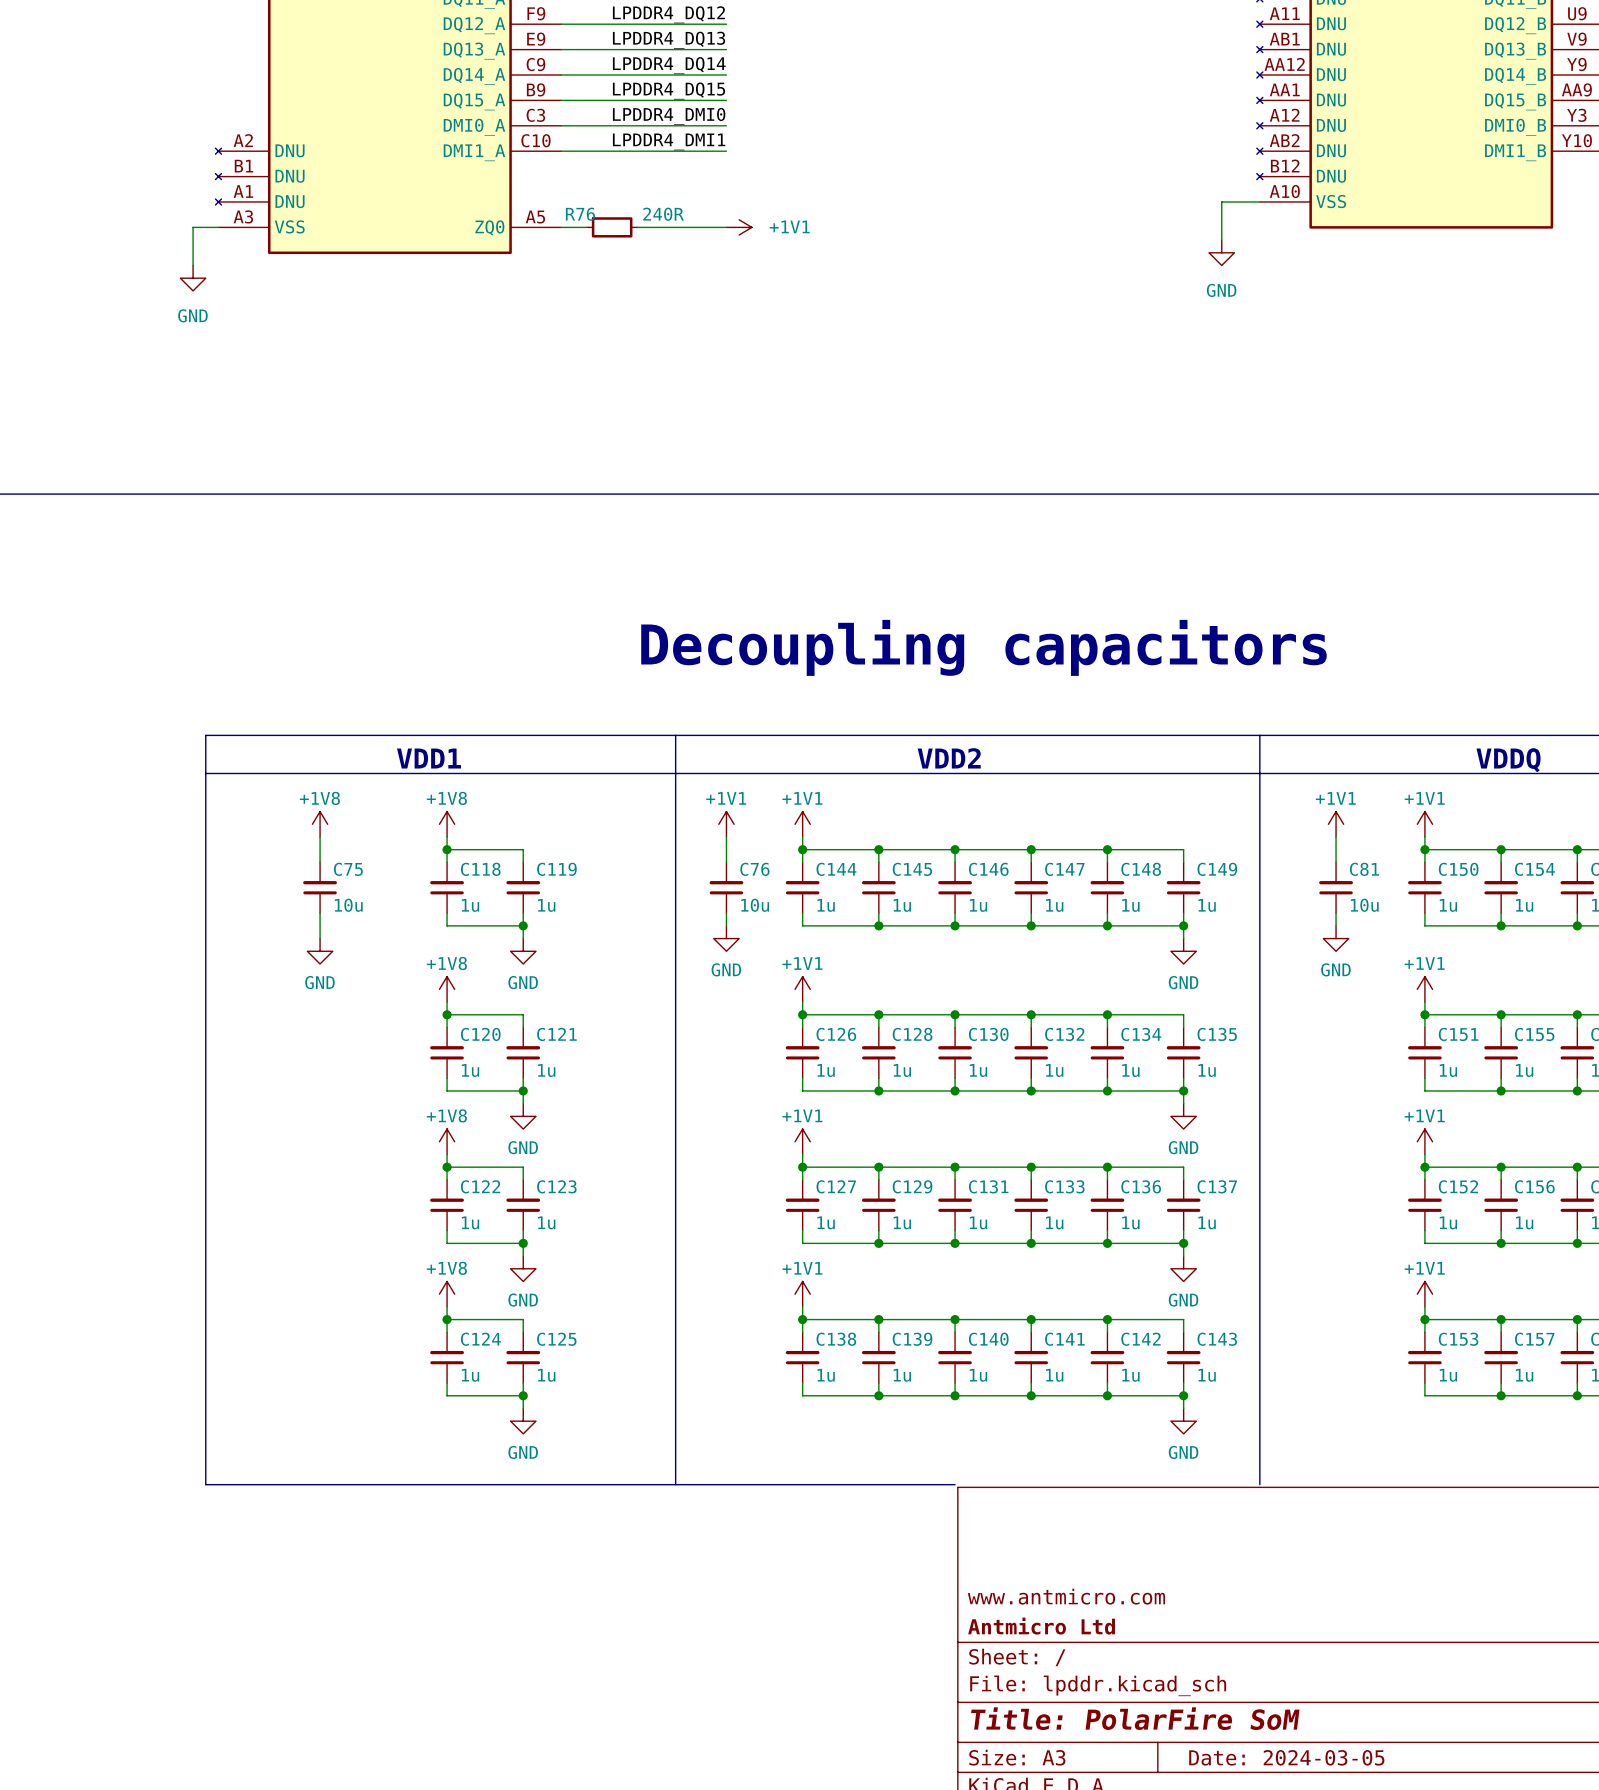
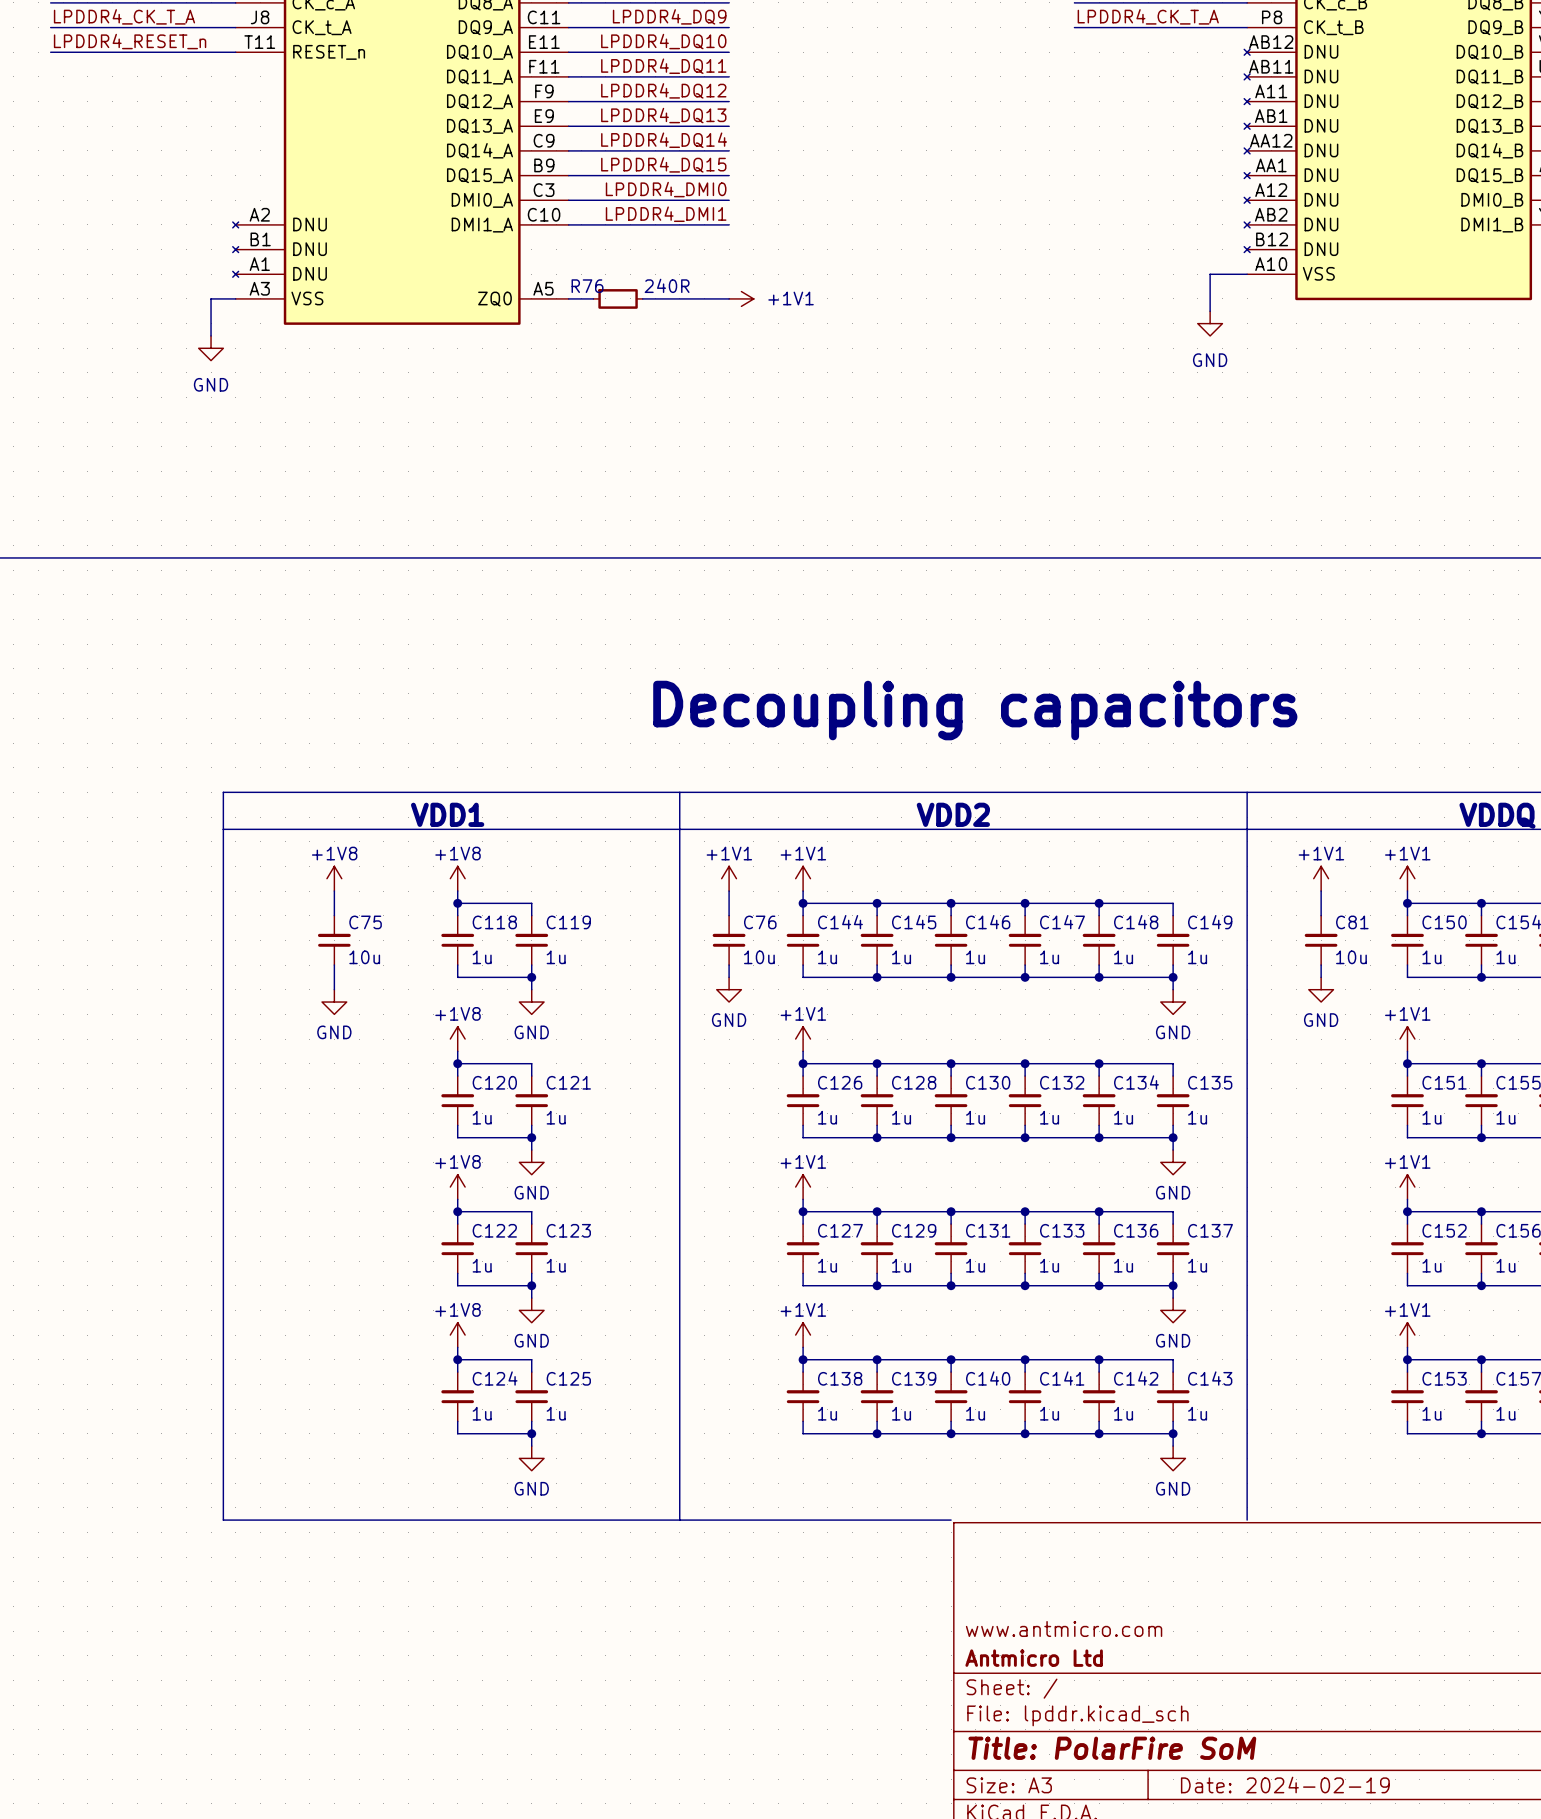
title block: Date: 2024-03-05 (1286, 1757) -> Date: 2024-02-19 (1285, 1785)

